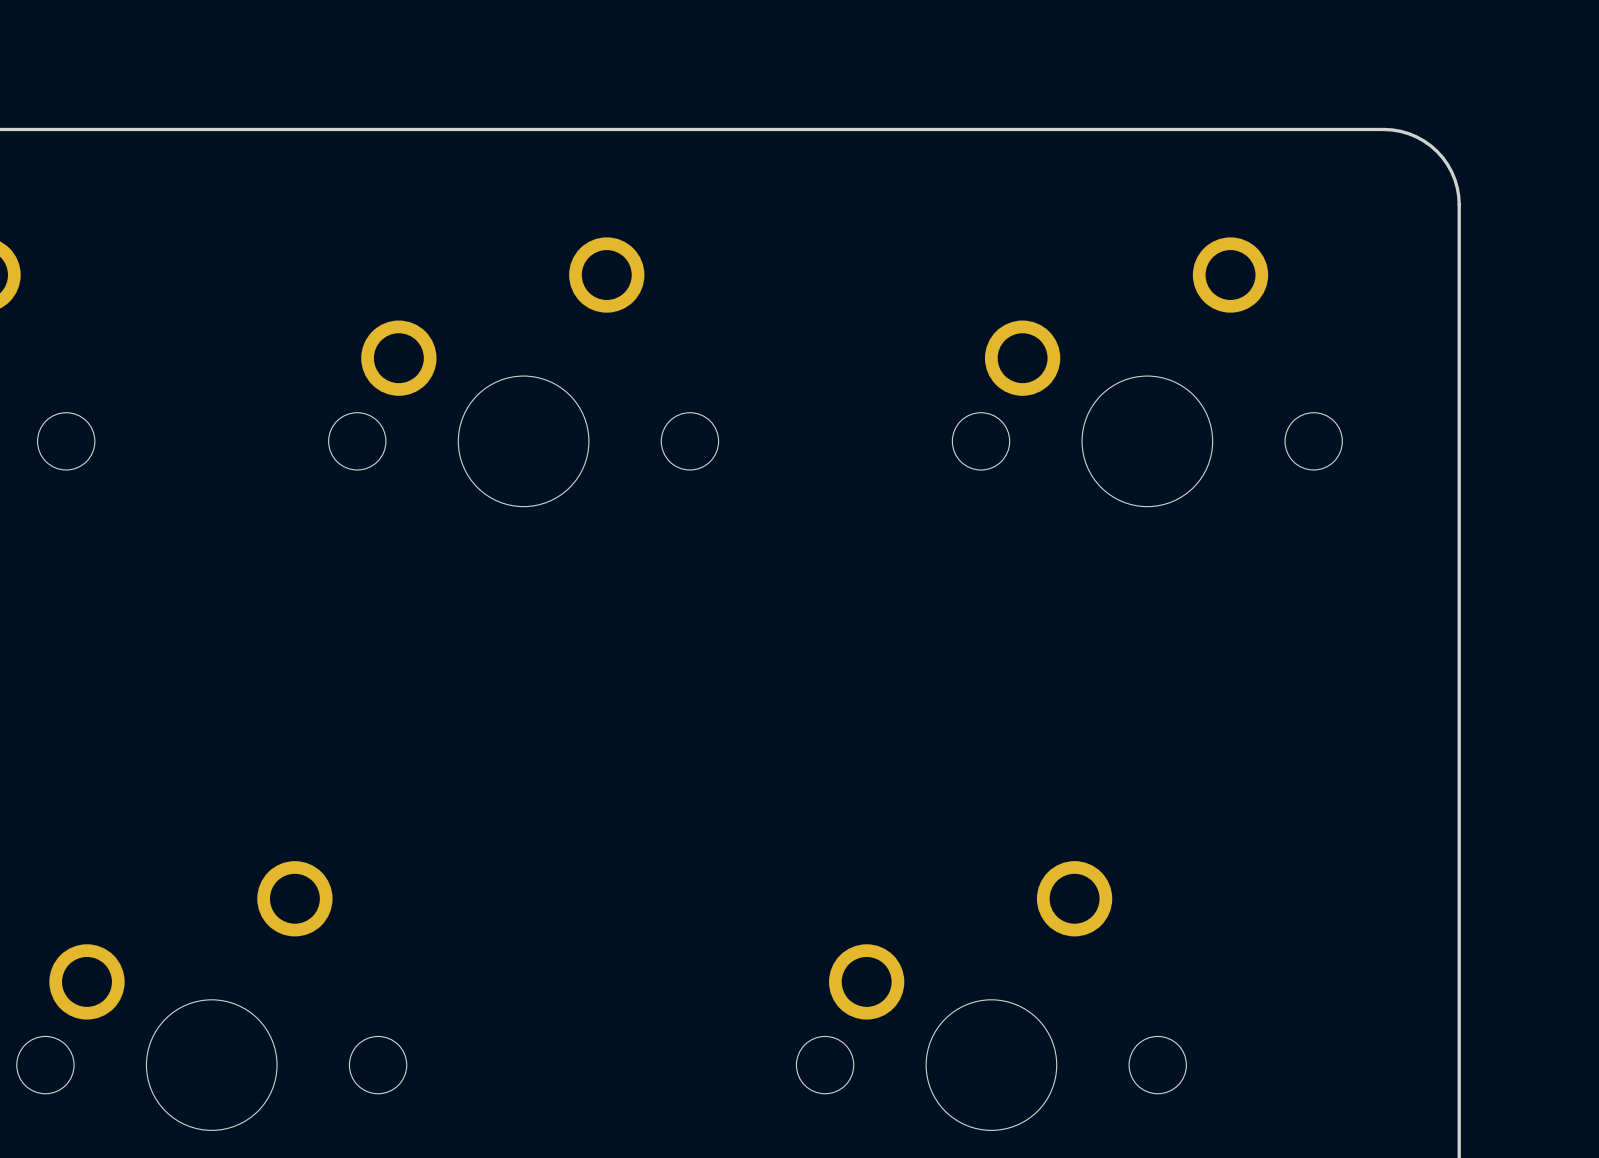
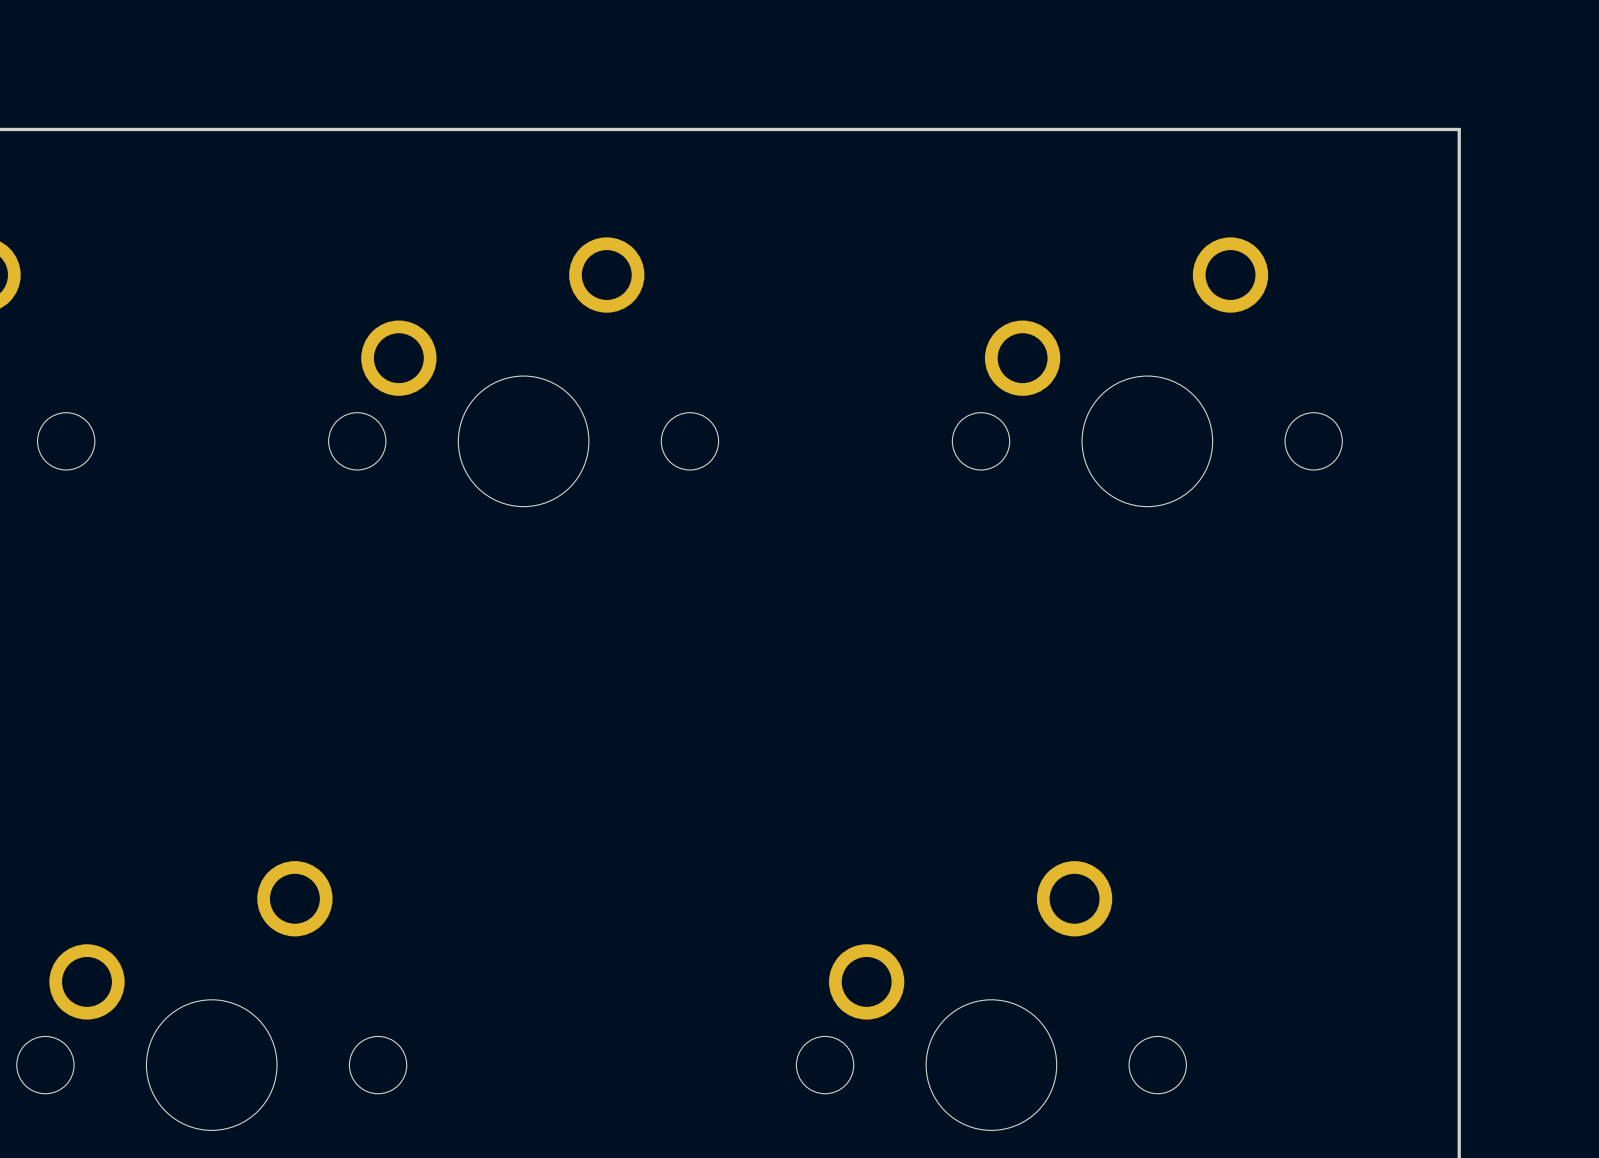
board edge: (1383, 129) (1400, 131) (1416, 136) (1437, 151) (1451, 172) (1457, 188) (1459, 204) -> (1383, 129) (1459, 129) (1459, 204)

